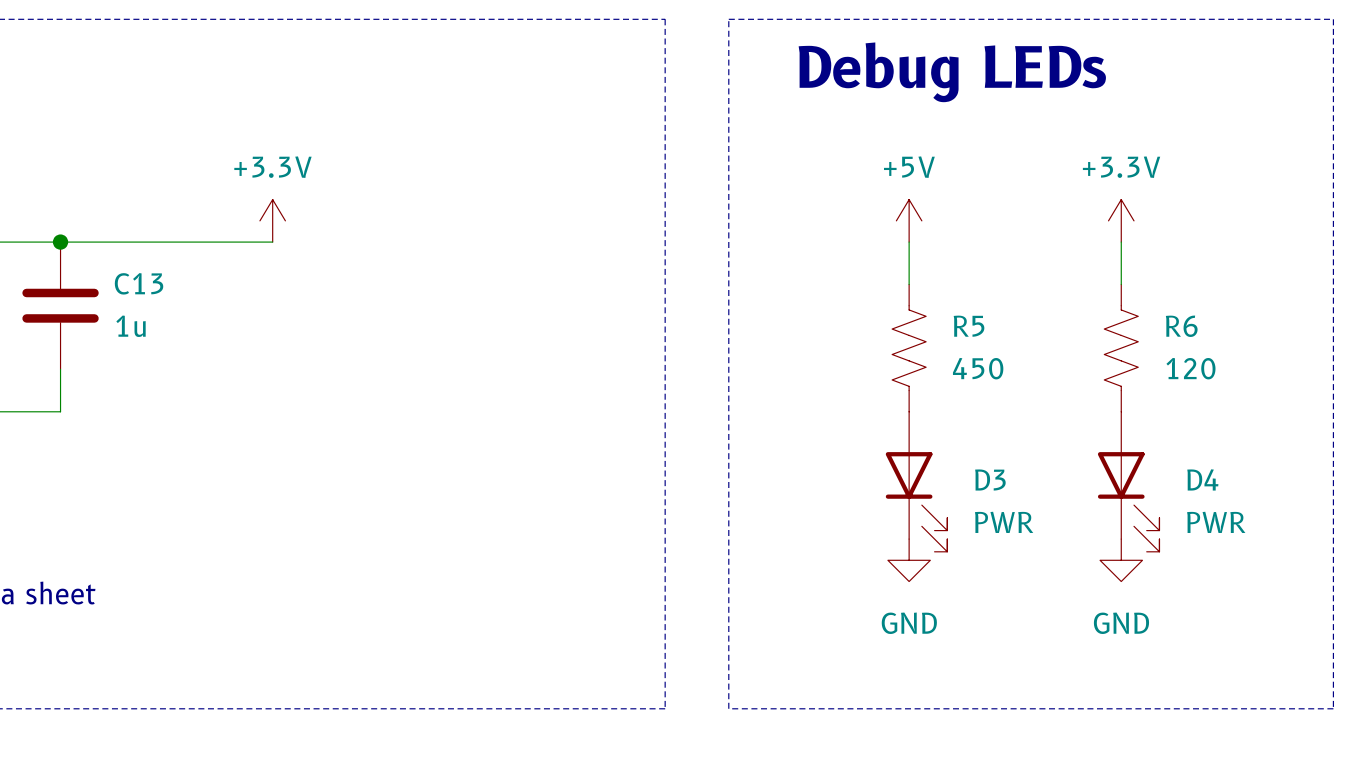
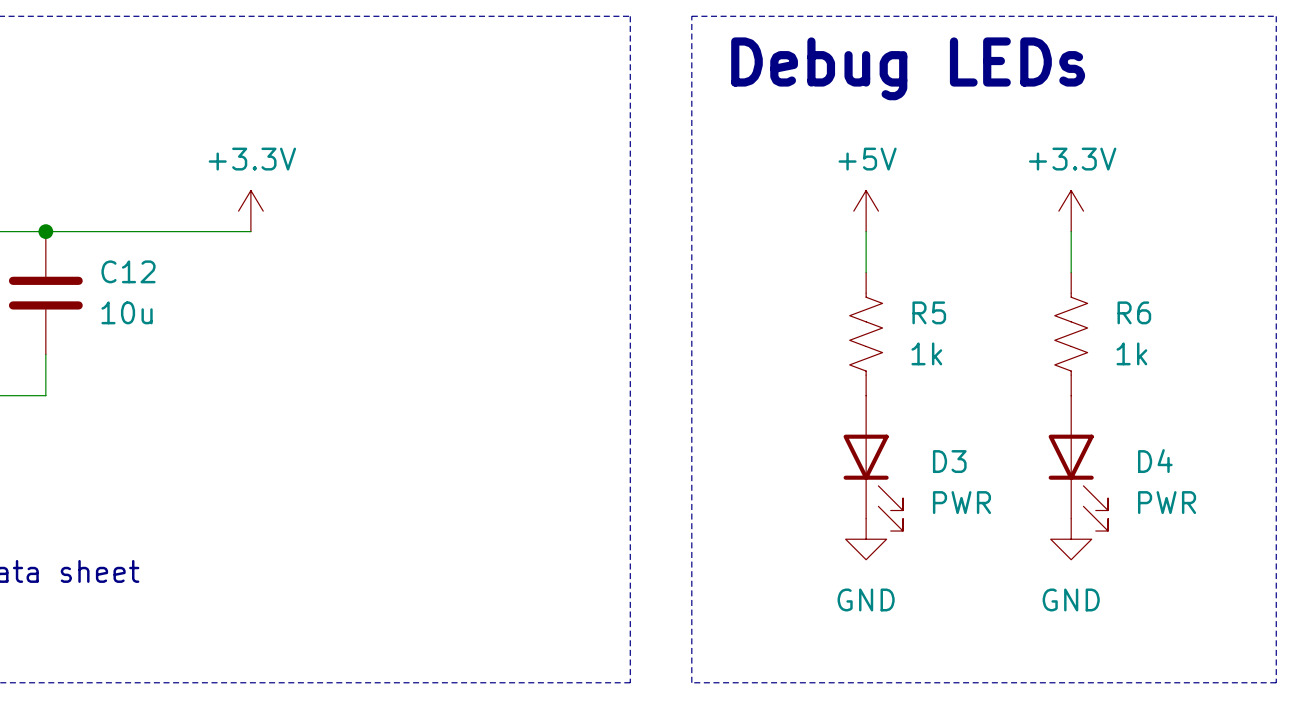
C13 name: C13 (139, 283) -> C12 (128, 271)
C13 value: 1u (131, 326) -> 10u (127, 312)
R5 value: 450 (978, 368) -> 1k (926, 353)
R6 value: 120 (1190, 368) -> 1k (1131, 353)

